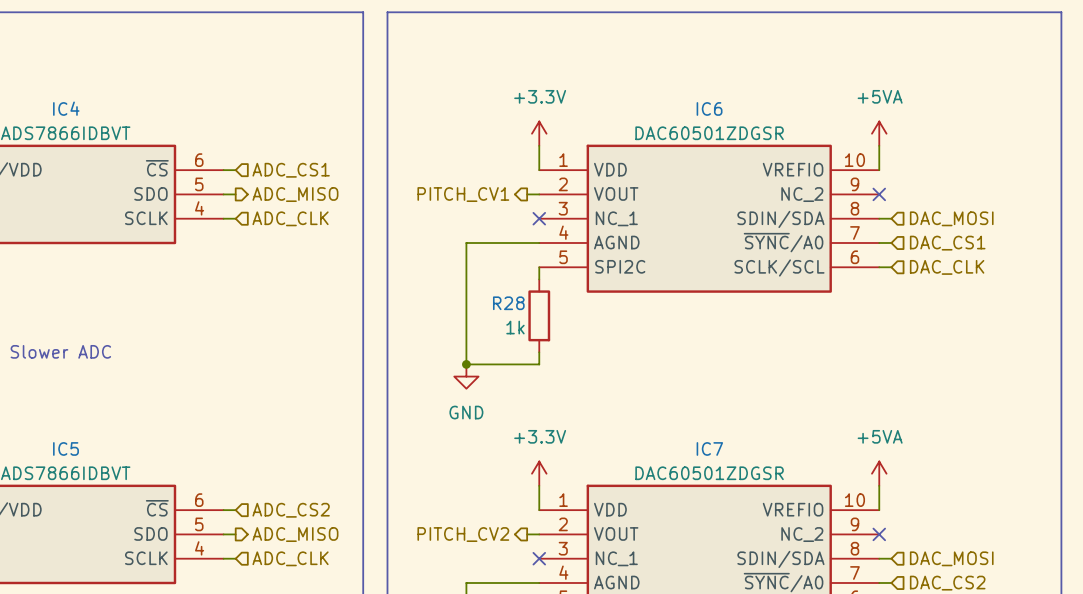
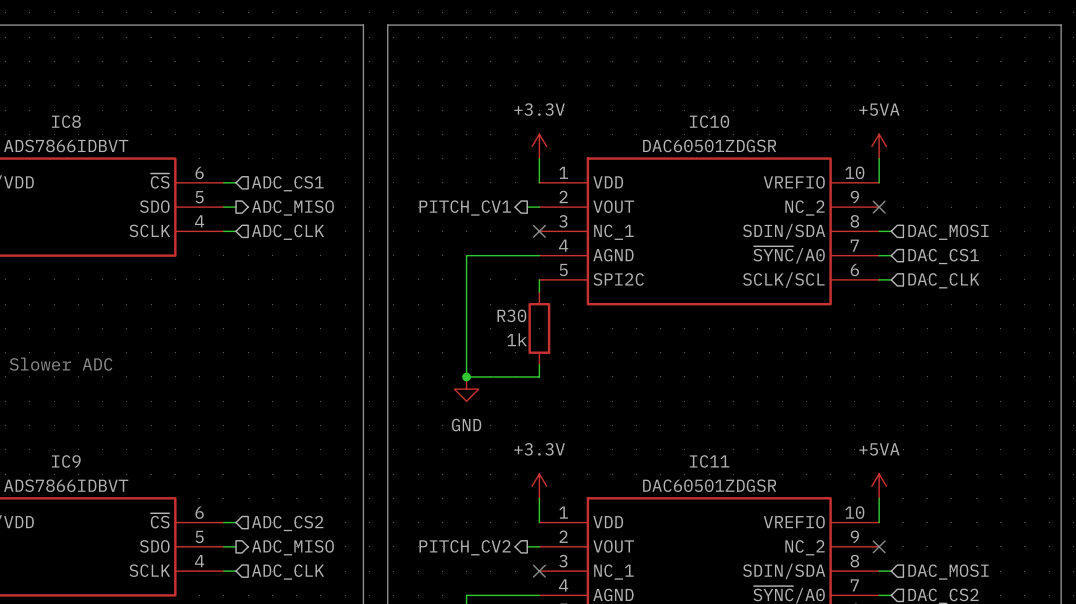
IC4 name: IC4 (66, 108) -> IC8 (66, 121)
IC6 name: IC6 (709, 108) -> IC10 (709, 121)
R28 name: R28 (508, 303) -> R30 (511, 315)
IC5 name: IC5 (65, 448) -> IC9 (66, 461)
IC7 name: IC7 (709, 448) -> IC11 (709, 461)

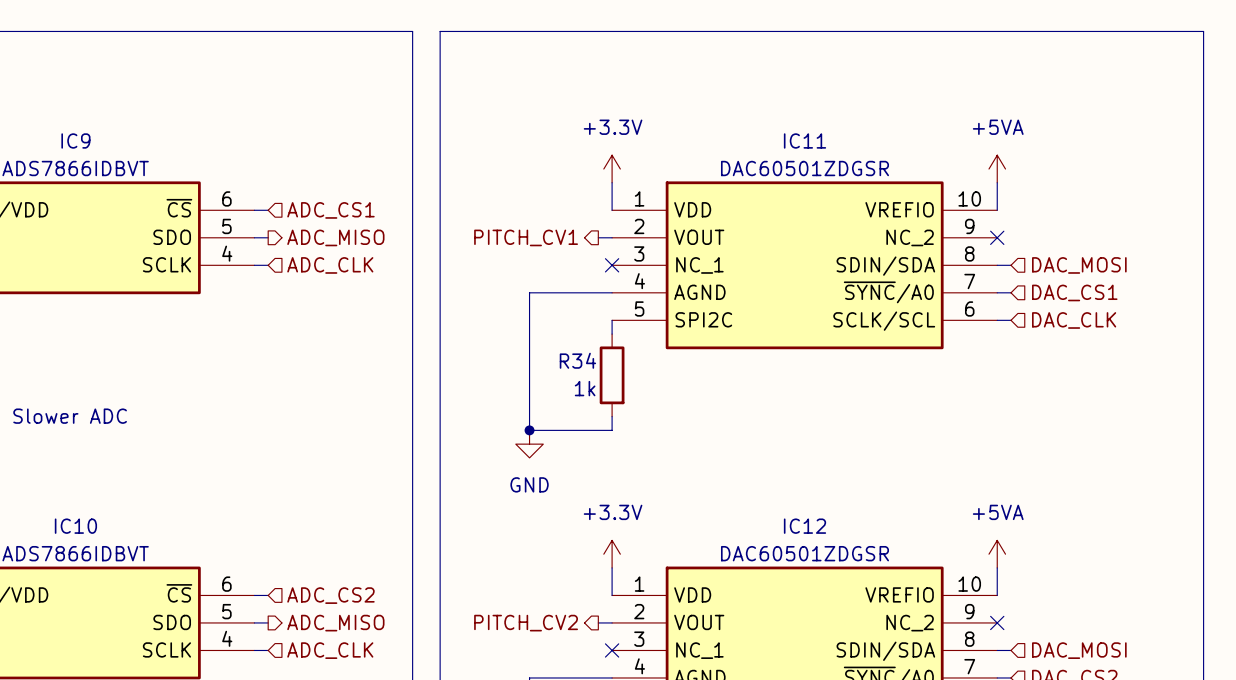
IC8 name: IC8 (66, 121) -> IC9 (75, 140)
IC10 name: IC10 (709, 121) -> IC11 (804, 140)
R30 name: R30 (511, 315) -> R34 (577, 360)
IC9 name: IC9 (66, 461) -> IC10 (75, 526)
IC11 name: IC11 (709, 461) -> IC12 (804, 526)

